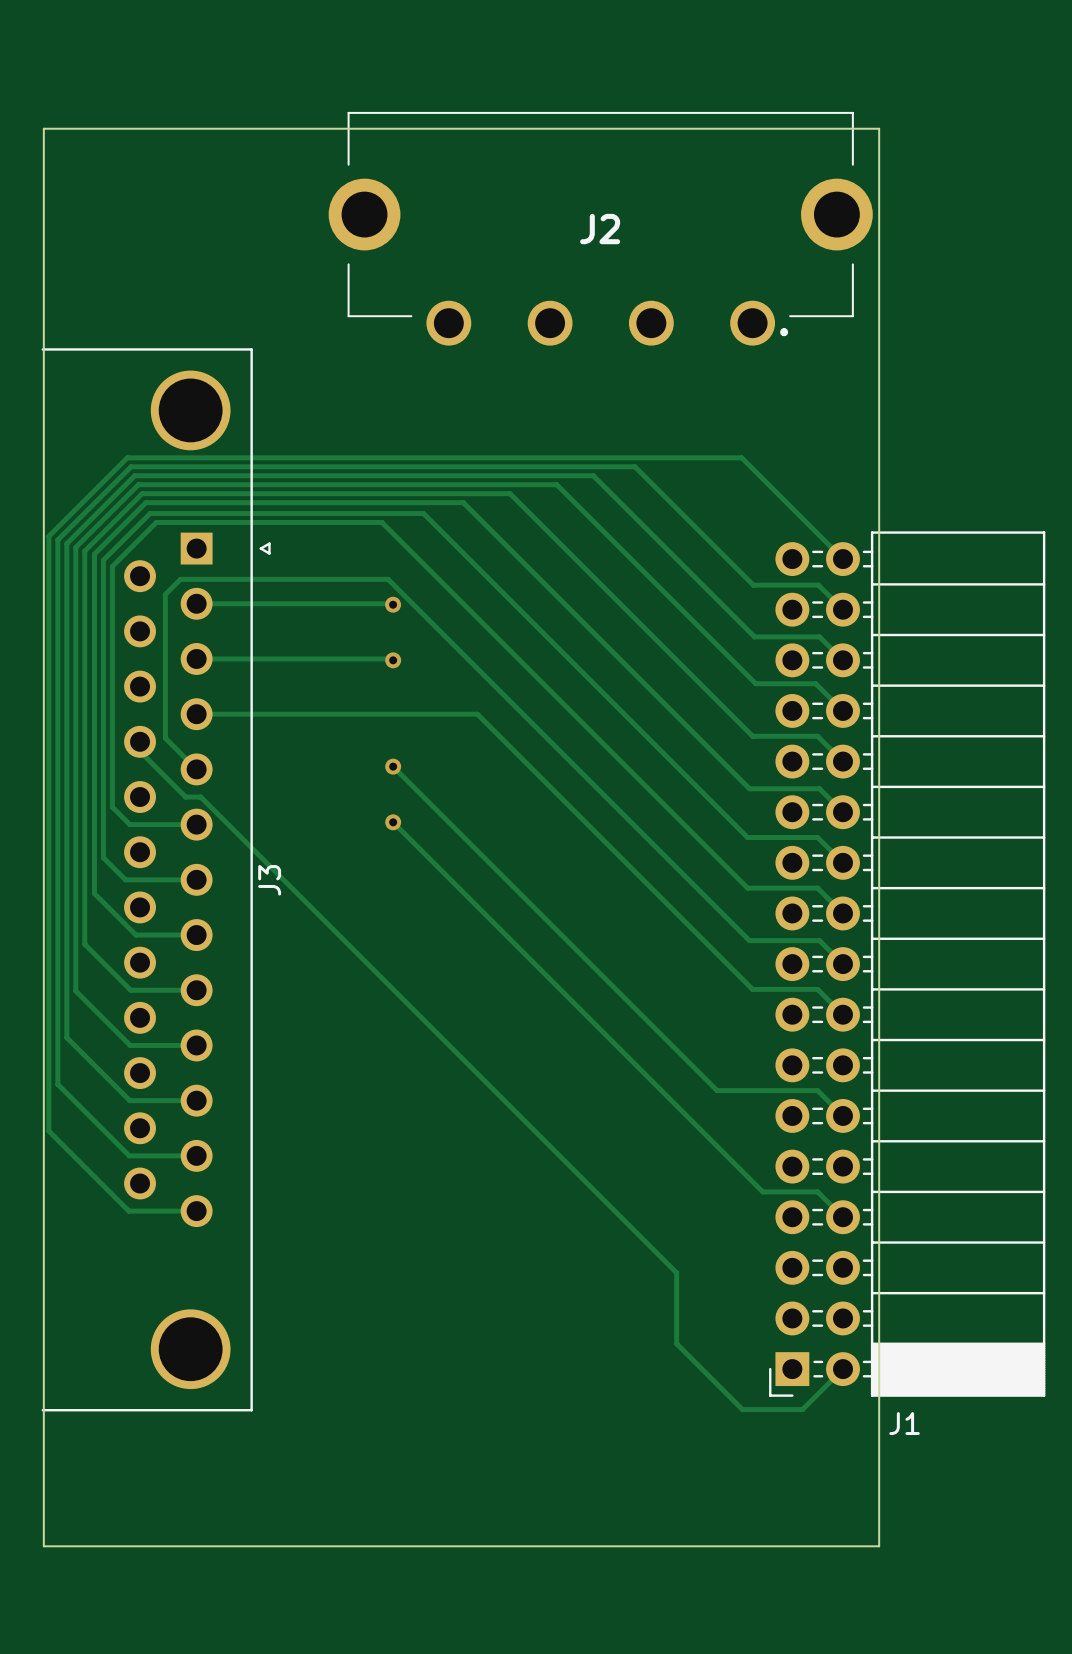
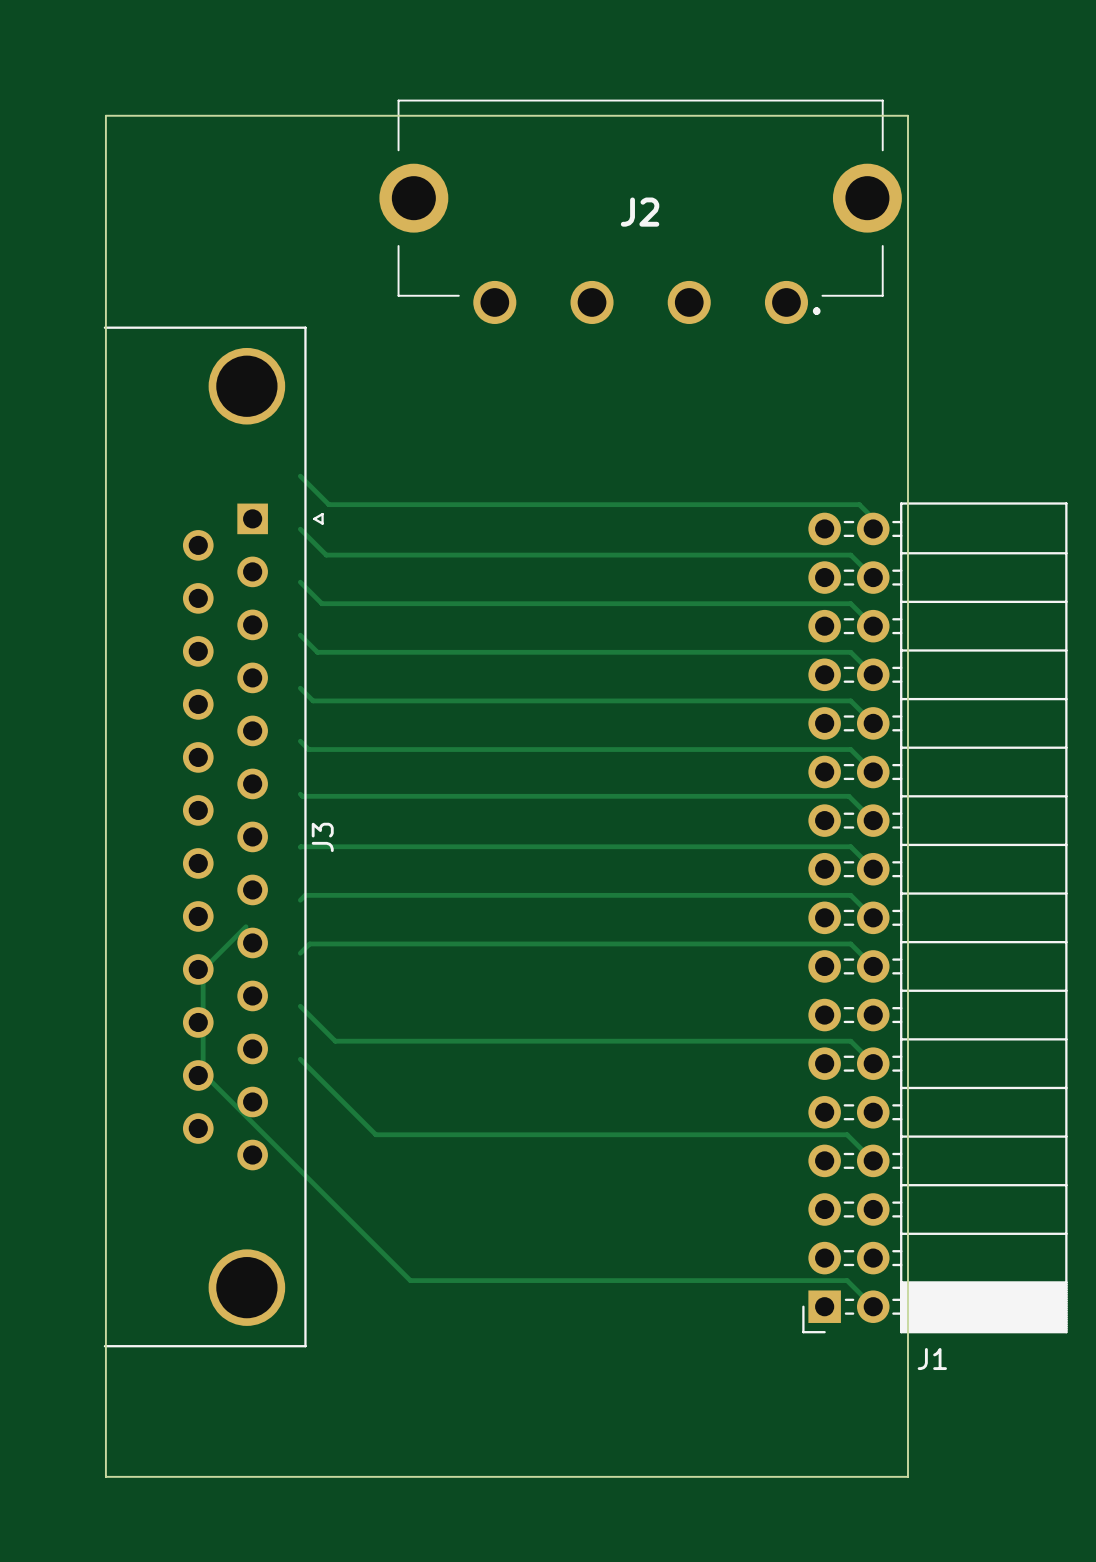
track: none -> (300, 476) (328, 504) (859, 504) (873, 518)
track: (843, 559) (741, 457) (127, 457) (48, 536) (48, 1131) (128, 1211) (196, 1211) -> none
track: (819, 586) (753, 585) (635, 466) (131, 466) (57, 539) (57, 1084) (129, 1155) (196, 1155) -> (850, 555) (326, 555) (300, 529)
track: (196, 603) (393, 604) -> none
via: (393, 604) -> none
track: (754, 636) (593, 475) (134, 475) (66, 543) (66, 1037) (129, 1100) (196, 1100) -> (788, 603) (321, 603) (300, 582)
track: (196, 658) (393, 660) -> none
via: (393, 660) -> none
track: (819, 687) (815, 683) (755, 683) (556, 484) (138, 484) (75, 547) (75, 990) (130, 1045) (196, 1045) -> (850, 652) (317, 652) (300, 635)
track: (196, 714) (477, 714) (752, 989) (817, 989) (819, 991) -> (300, 953) (309, 943) (850, 943)
track: (819, 738) (817, 736) (752, 736) (510, 493) (142, 493) (84, 551) (84, 944) (130, 990) (196, 990) -> (850, 700) (313, 700) (300, 688)
track: (140, 741) (140, 751) (185, 797) (200, 797) (676, 1272) (676, 1343) (742, 1409) (802, 1409) (843, 1369) -> (246, 926) (203, 969) (203, 1073) (410, 1280) (847, 1280) (873, 1306)
track: (393, 766) (717, 1090) (817, 1090) (819, 1092) -> (300, 1006) (335, 1041) (850, 1041)
via: (393, 766) -> none
track: (196, 769) (165, 738) (165, 594) (180, 579) (388, 579) (749, 940) (819, 940) -> (300, 900) (305, 895) (850, 895)
track: (749, 788) (463, 502) (145, 502) (94, 554) (94, 893) (135, 935) (196, 935) -> (783, 749) (308, 749) (300, 741)
track: (393, 822) (762, 1191) (817, 1191) -> (300, 1059) (375, 1134) (847, 1134) (848, 1136)
via: (393, 822) -> none
track: (196, 824) (129, 824) (112, 807) (112, 566) (156, 522) (381, 522) (747, 888) (817, 888) (819, 890) -> (300, 847) (850, 846)
track: (747, 837) (423, 513) (150, 513) (103, 560) (103, 857) (125, 879) (196, 879) (204, 888) -> (781, 796) (302, 796) (300, 794)

